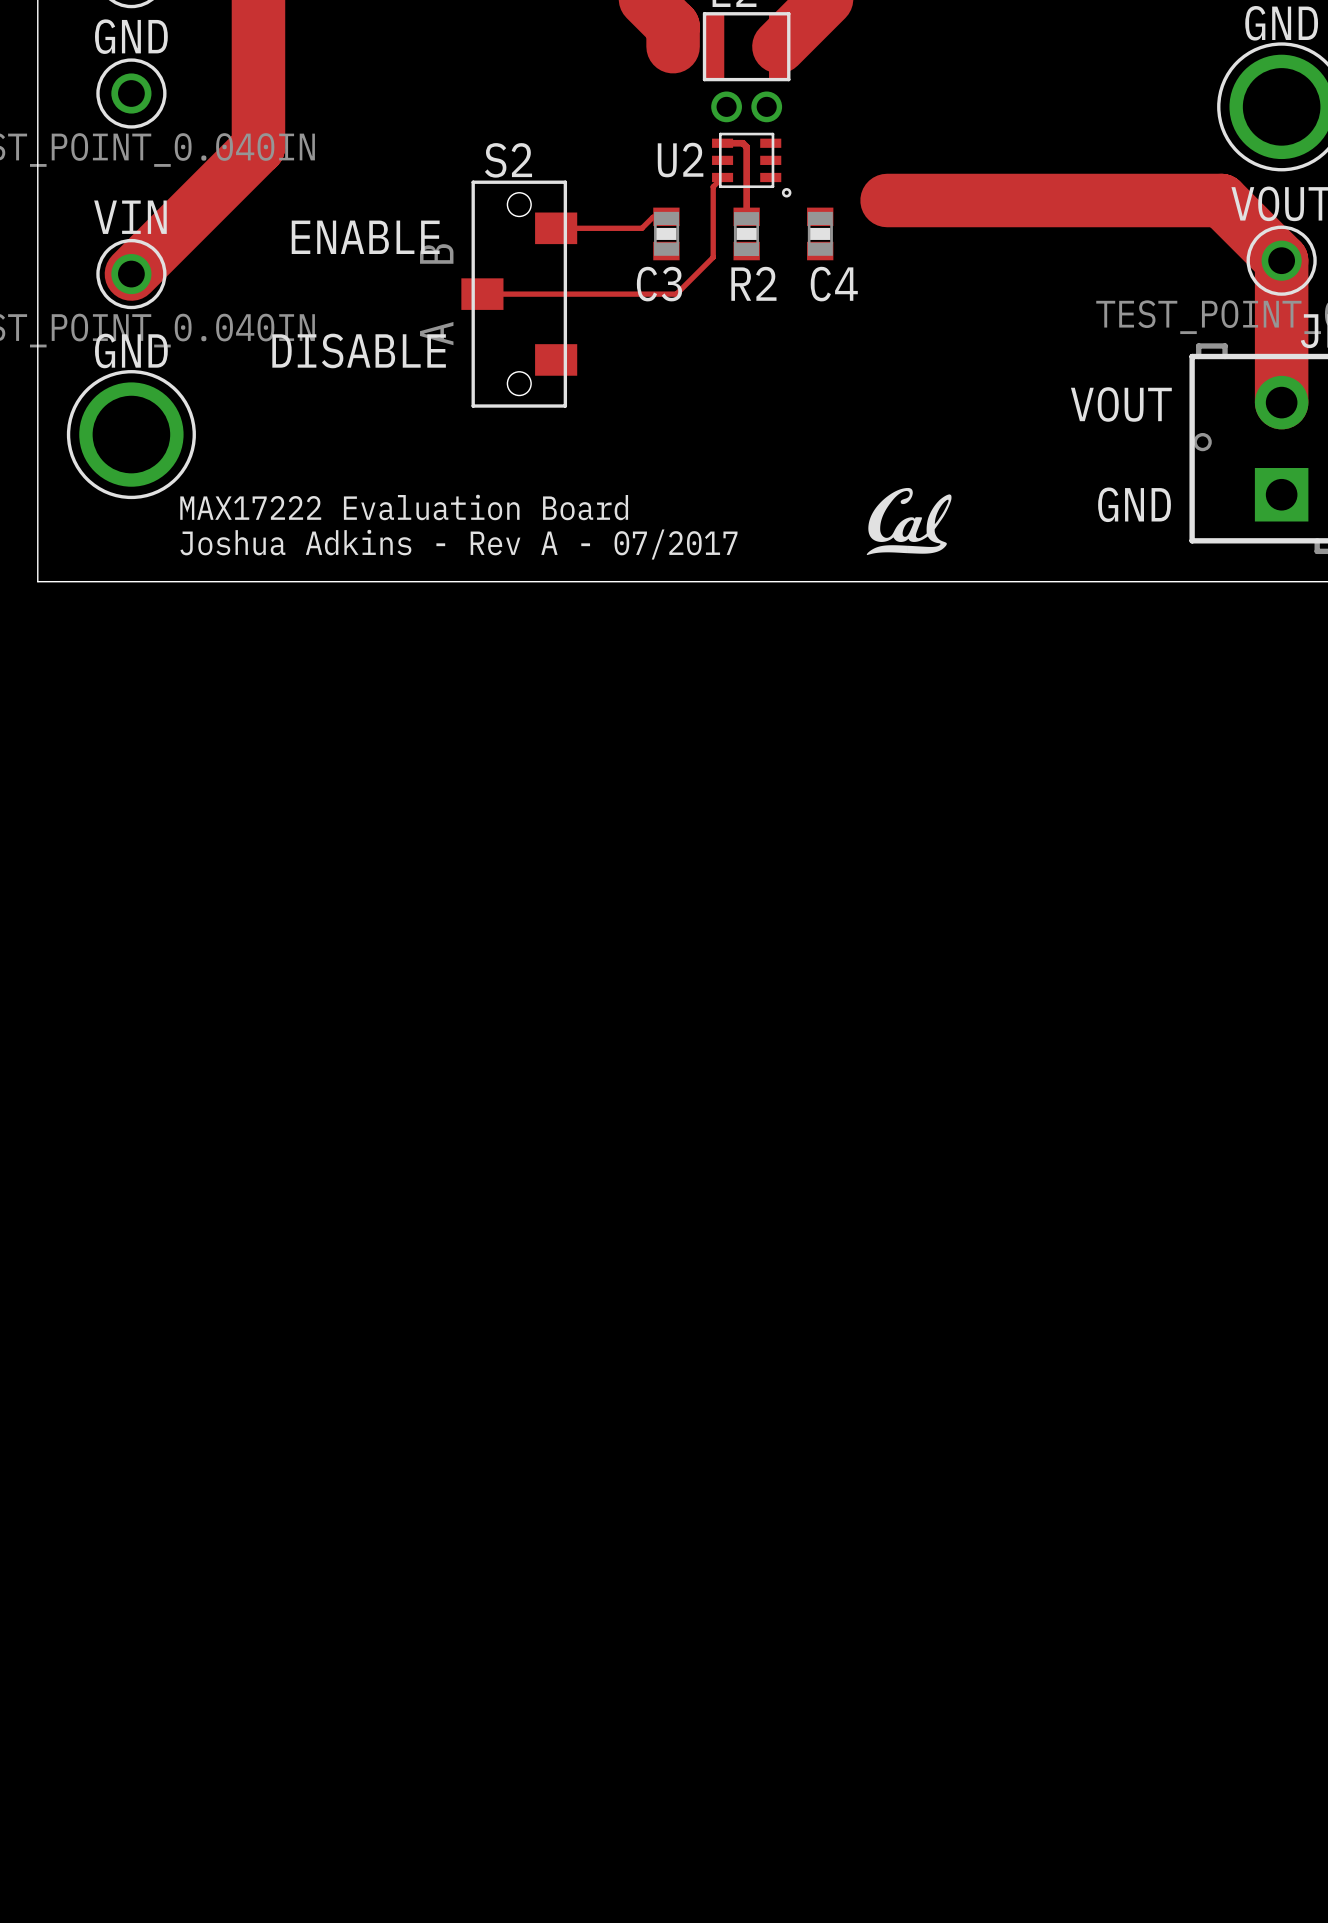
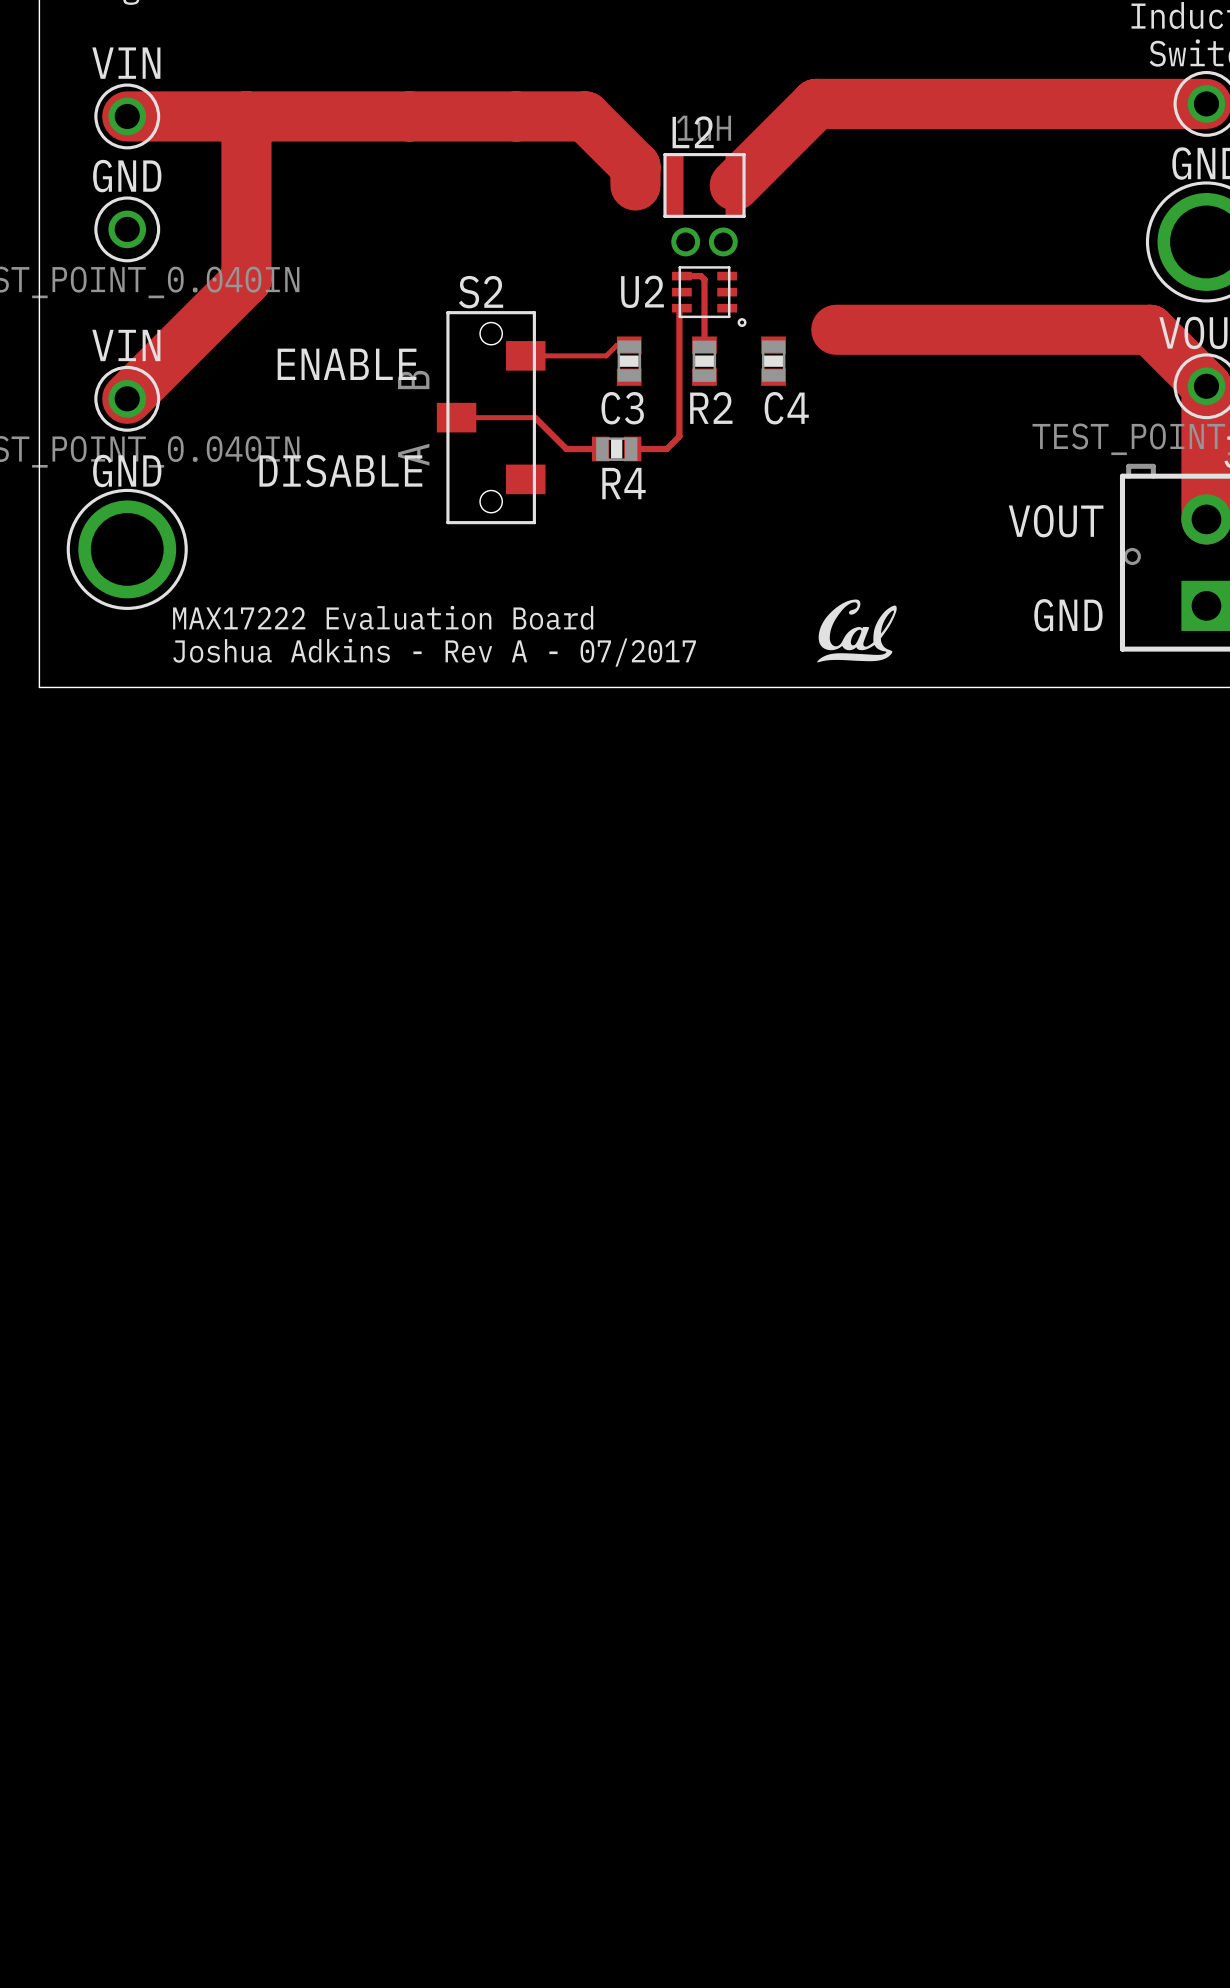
top track: (719, 180) (713, 186) (713, 257) (676, 294) (566, 294) -> (679, 310) (679, 436) (666, 449) (632, 449)
top track: none -> (535, 417) (566, 449) (600, 449)
R4: none -> (616, 449)

